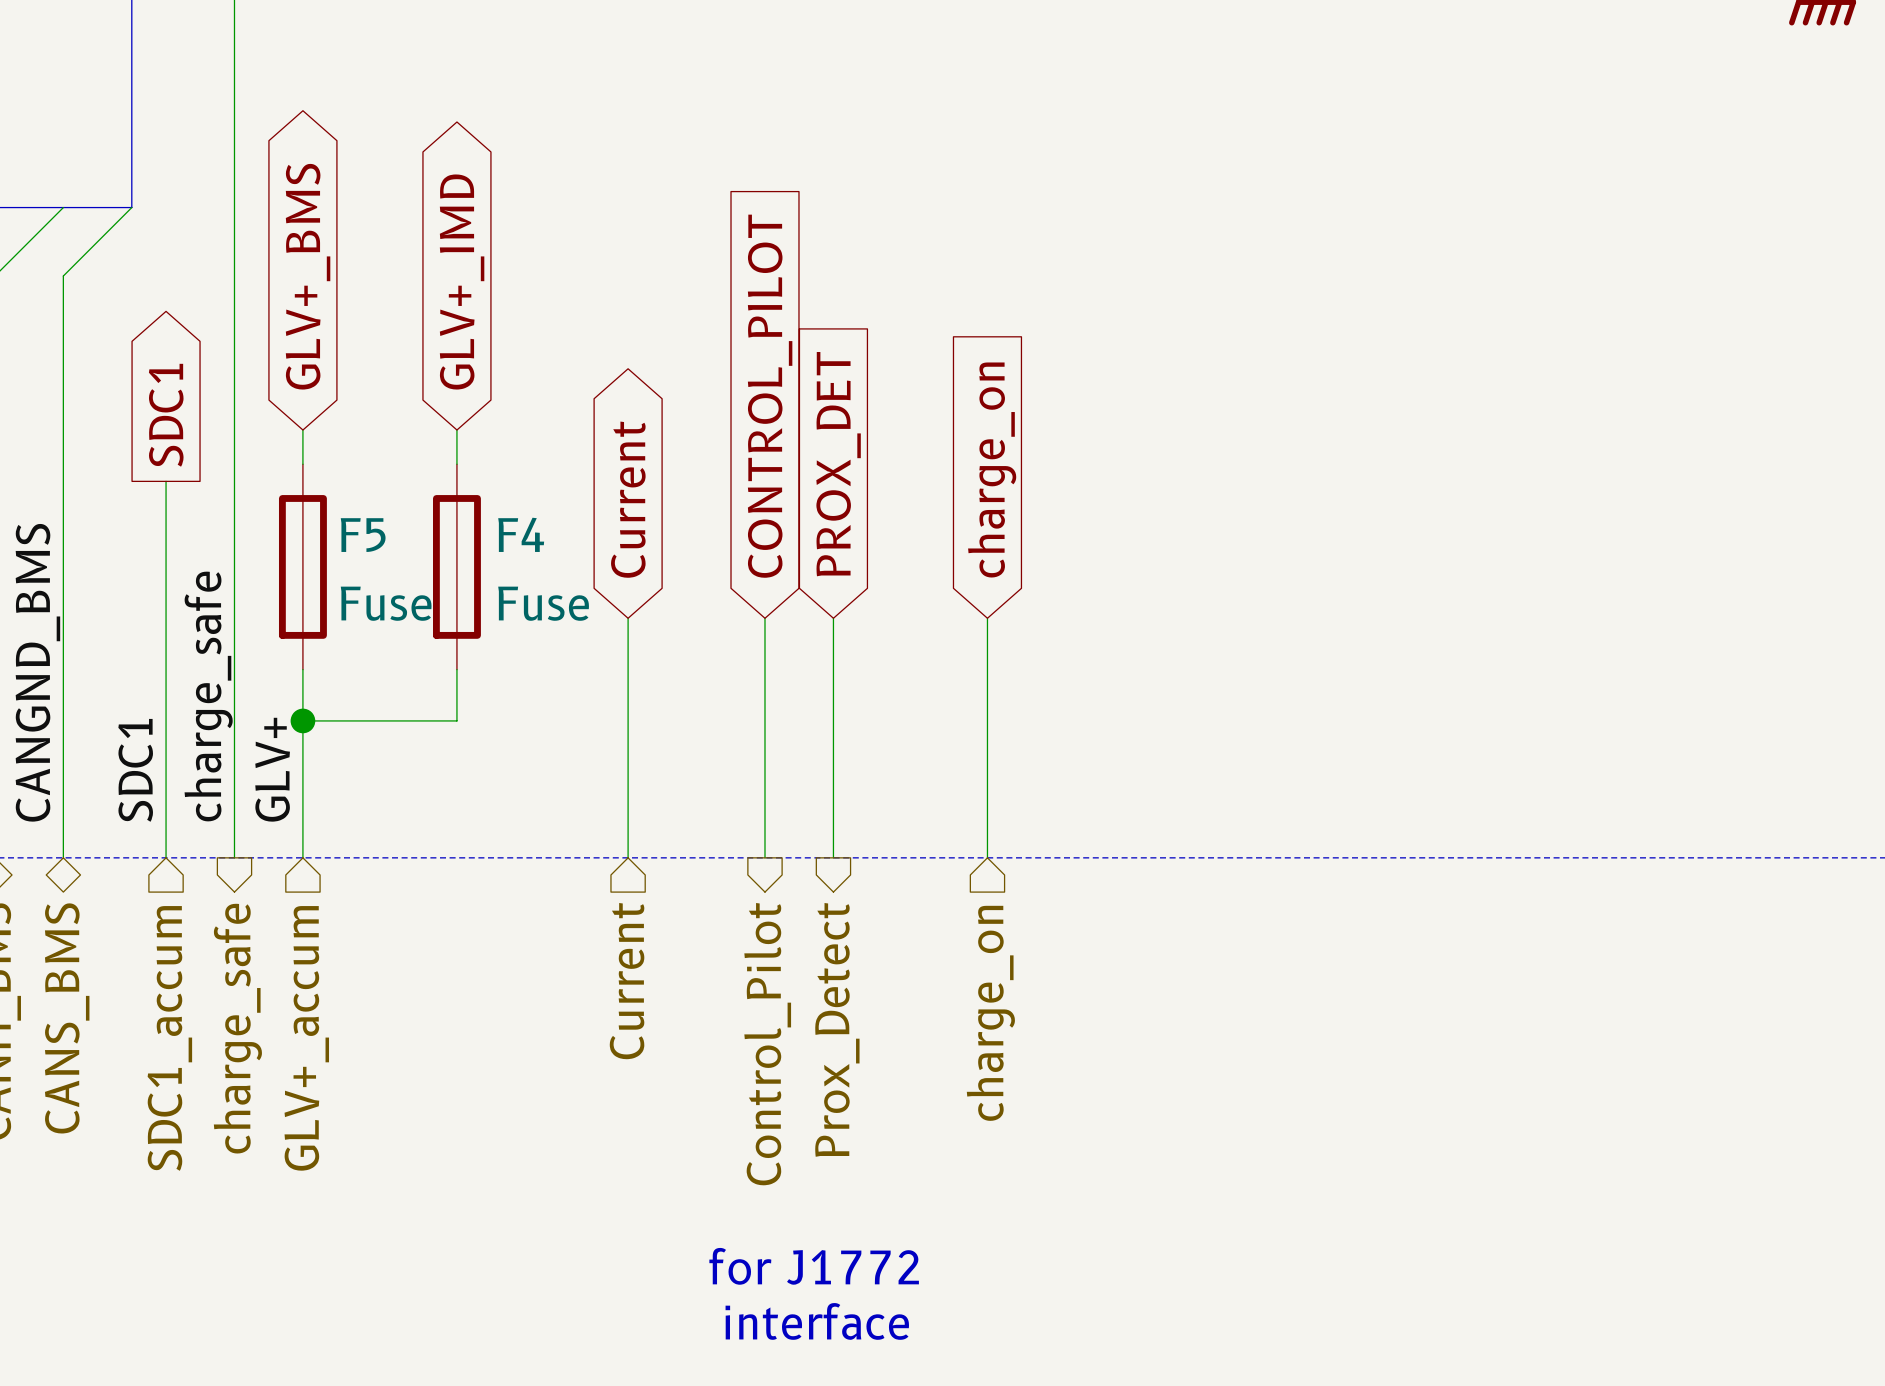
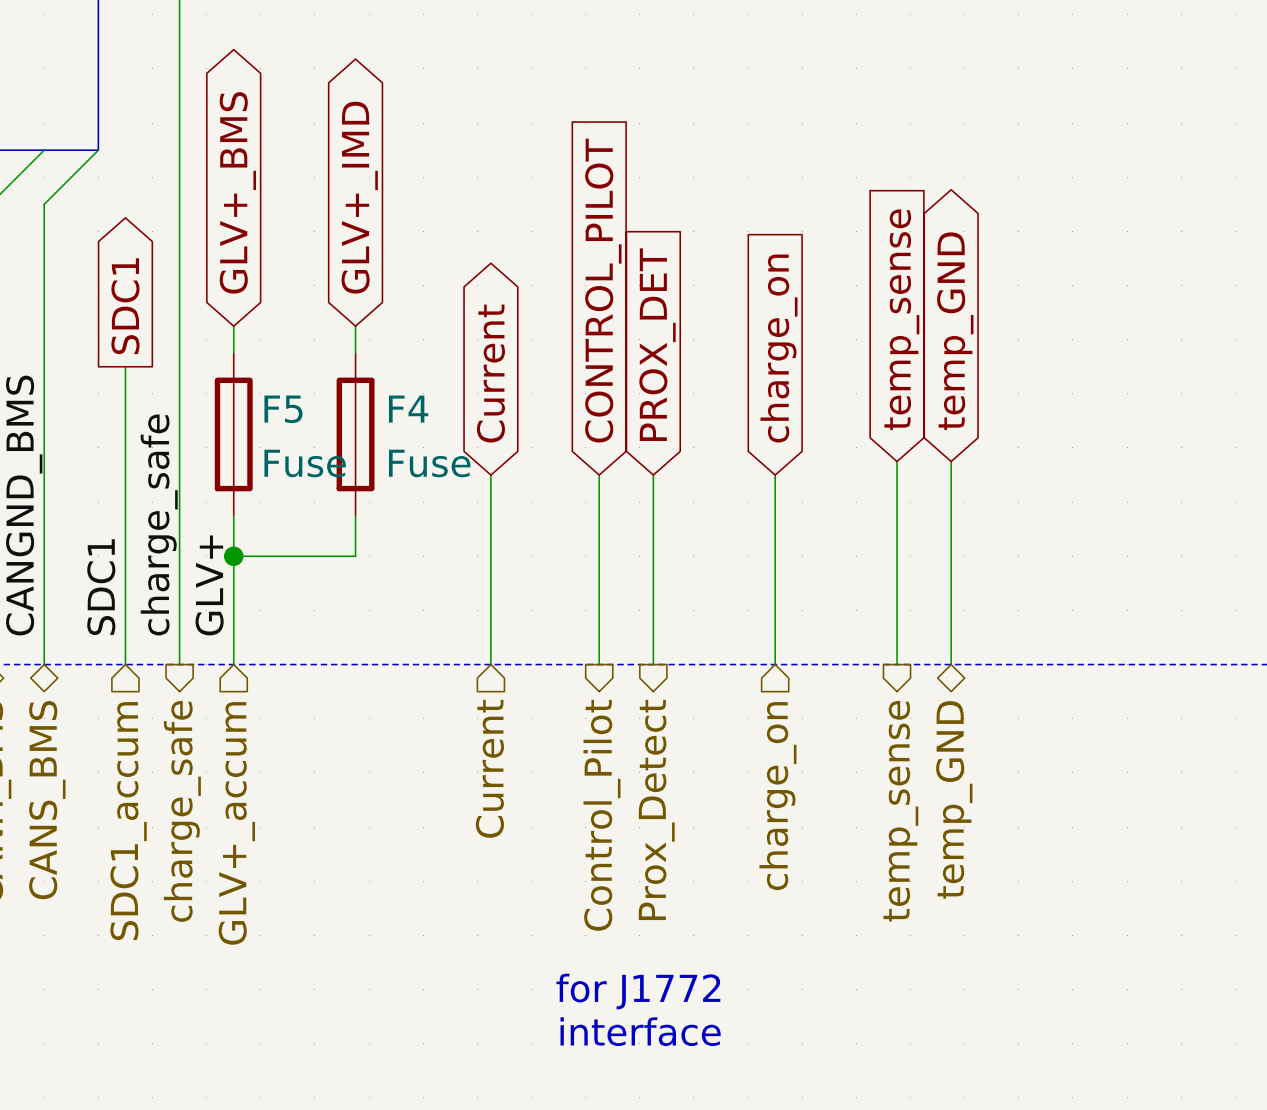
global label: none -> temp_sense (901, 319)
global label: none -> temp_GND (955, 331)
wire: none -> (897, 461) (897, 664)
wire: none -> (951, 461) (951, 664)
hierarchical label: none -> temp_GND (954, 799)
hierarchical label: none -> temp_sense (900, 811)

